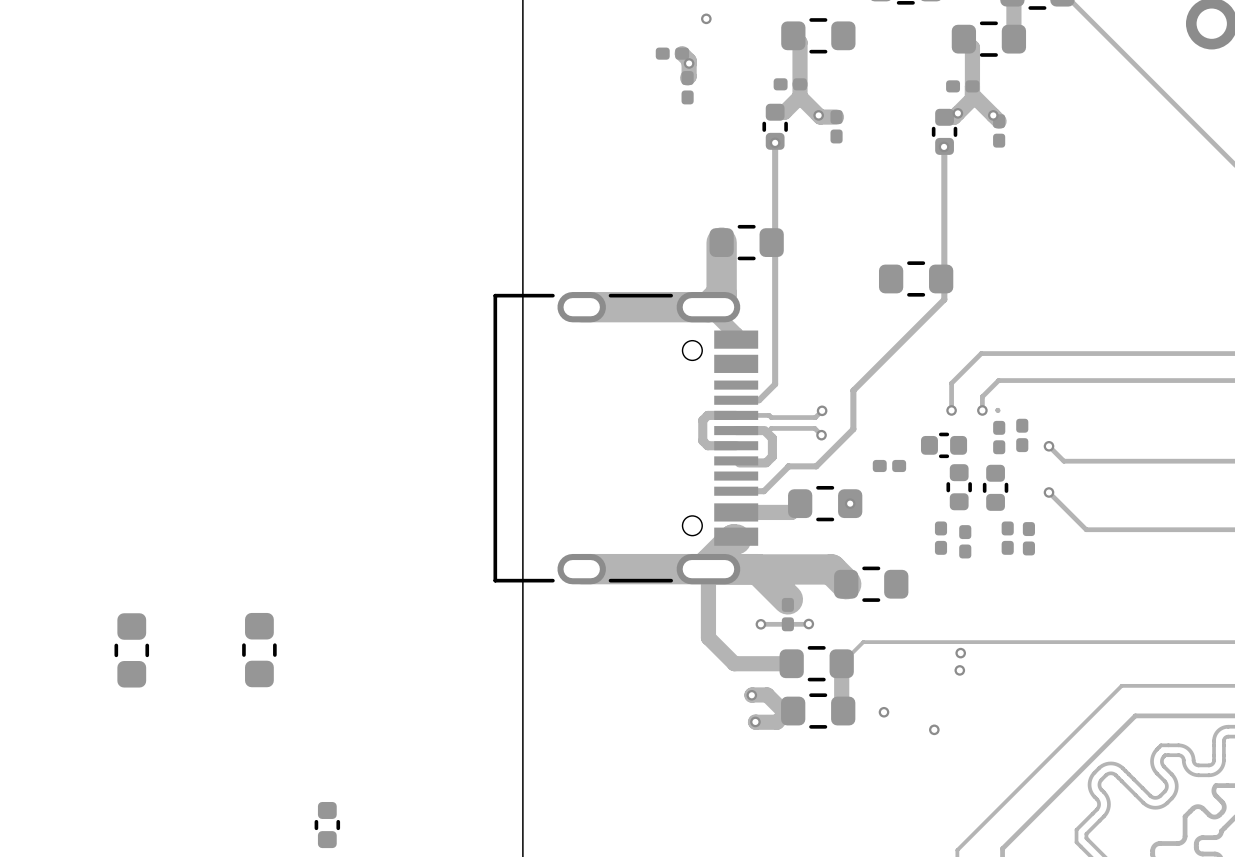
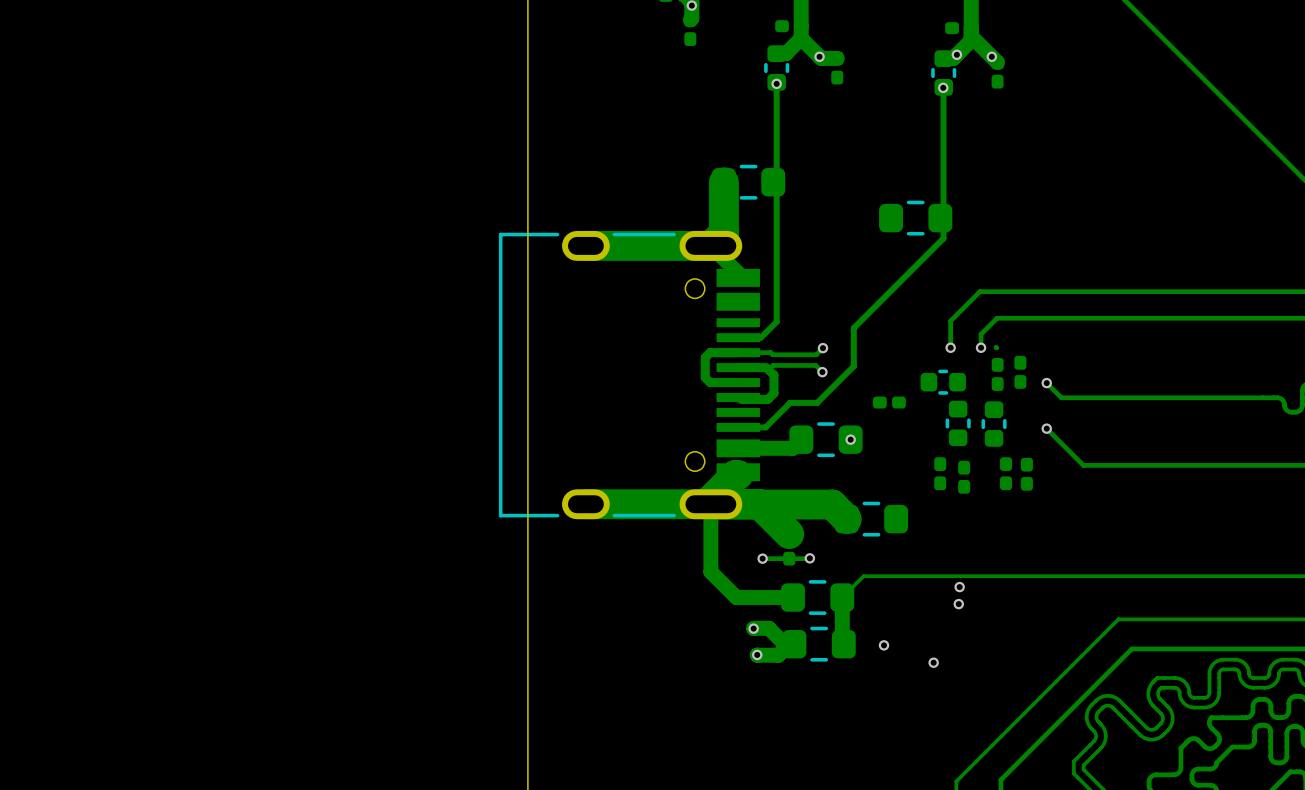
part: (131, 650) -> none
part: (259, 650) -> none
part: (327, 825) -> none

